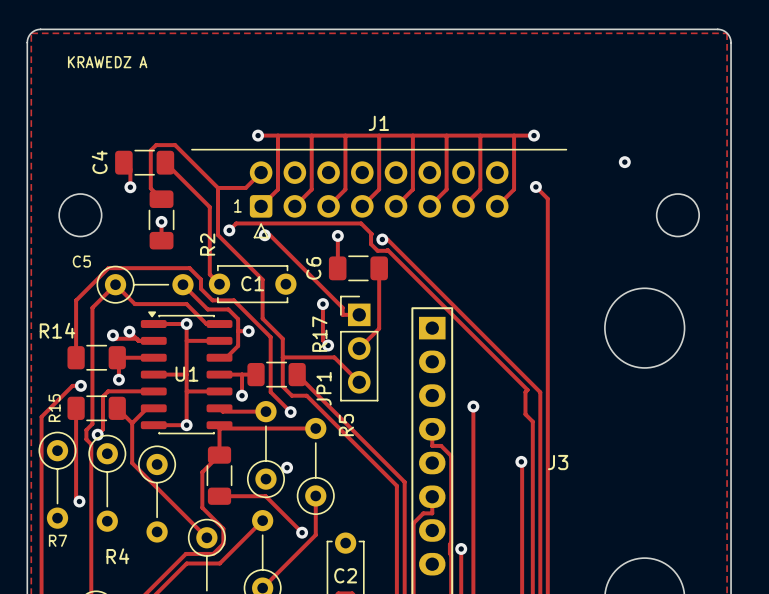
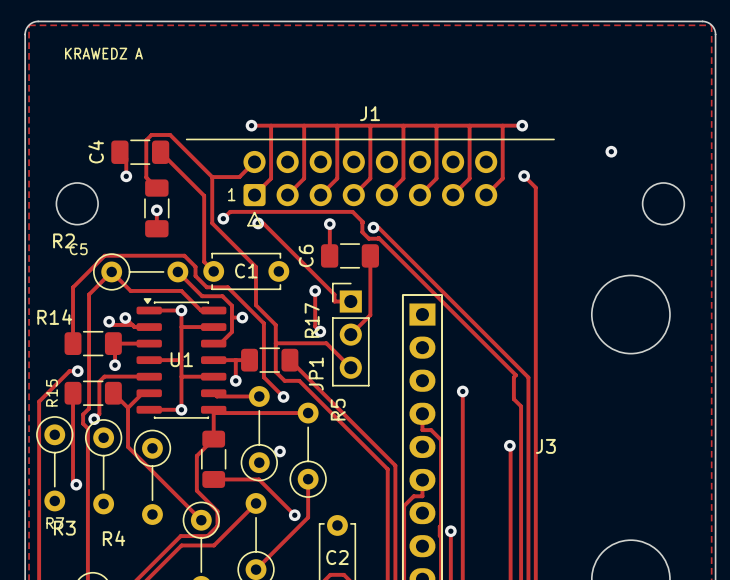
R2 name rotation: 0° (207, 244) -> 90° clockwise (64, 240)
R2 name position: R2 (207, 244) -> R2 (64, 240)
R3 name: none -> R3 (64, 528)

